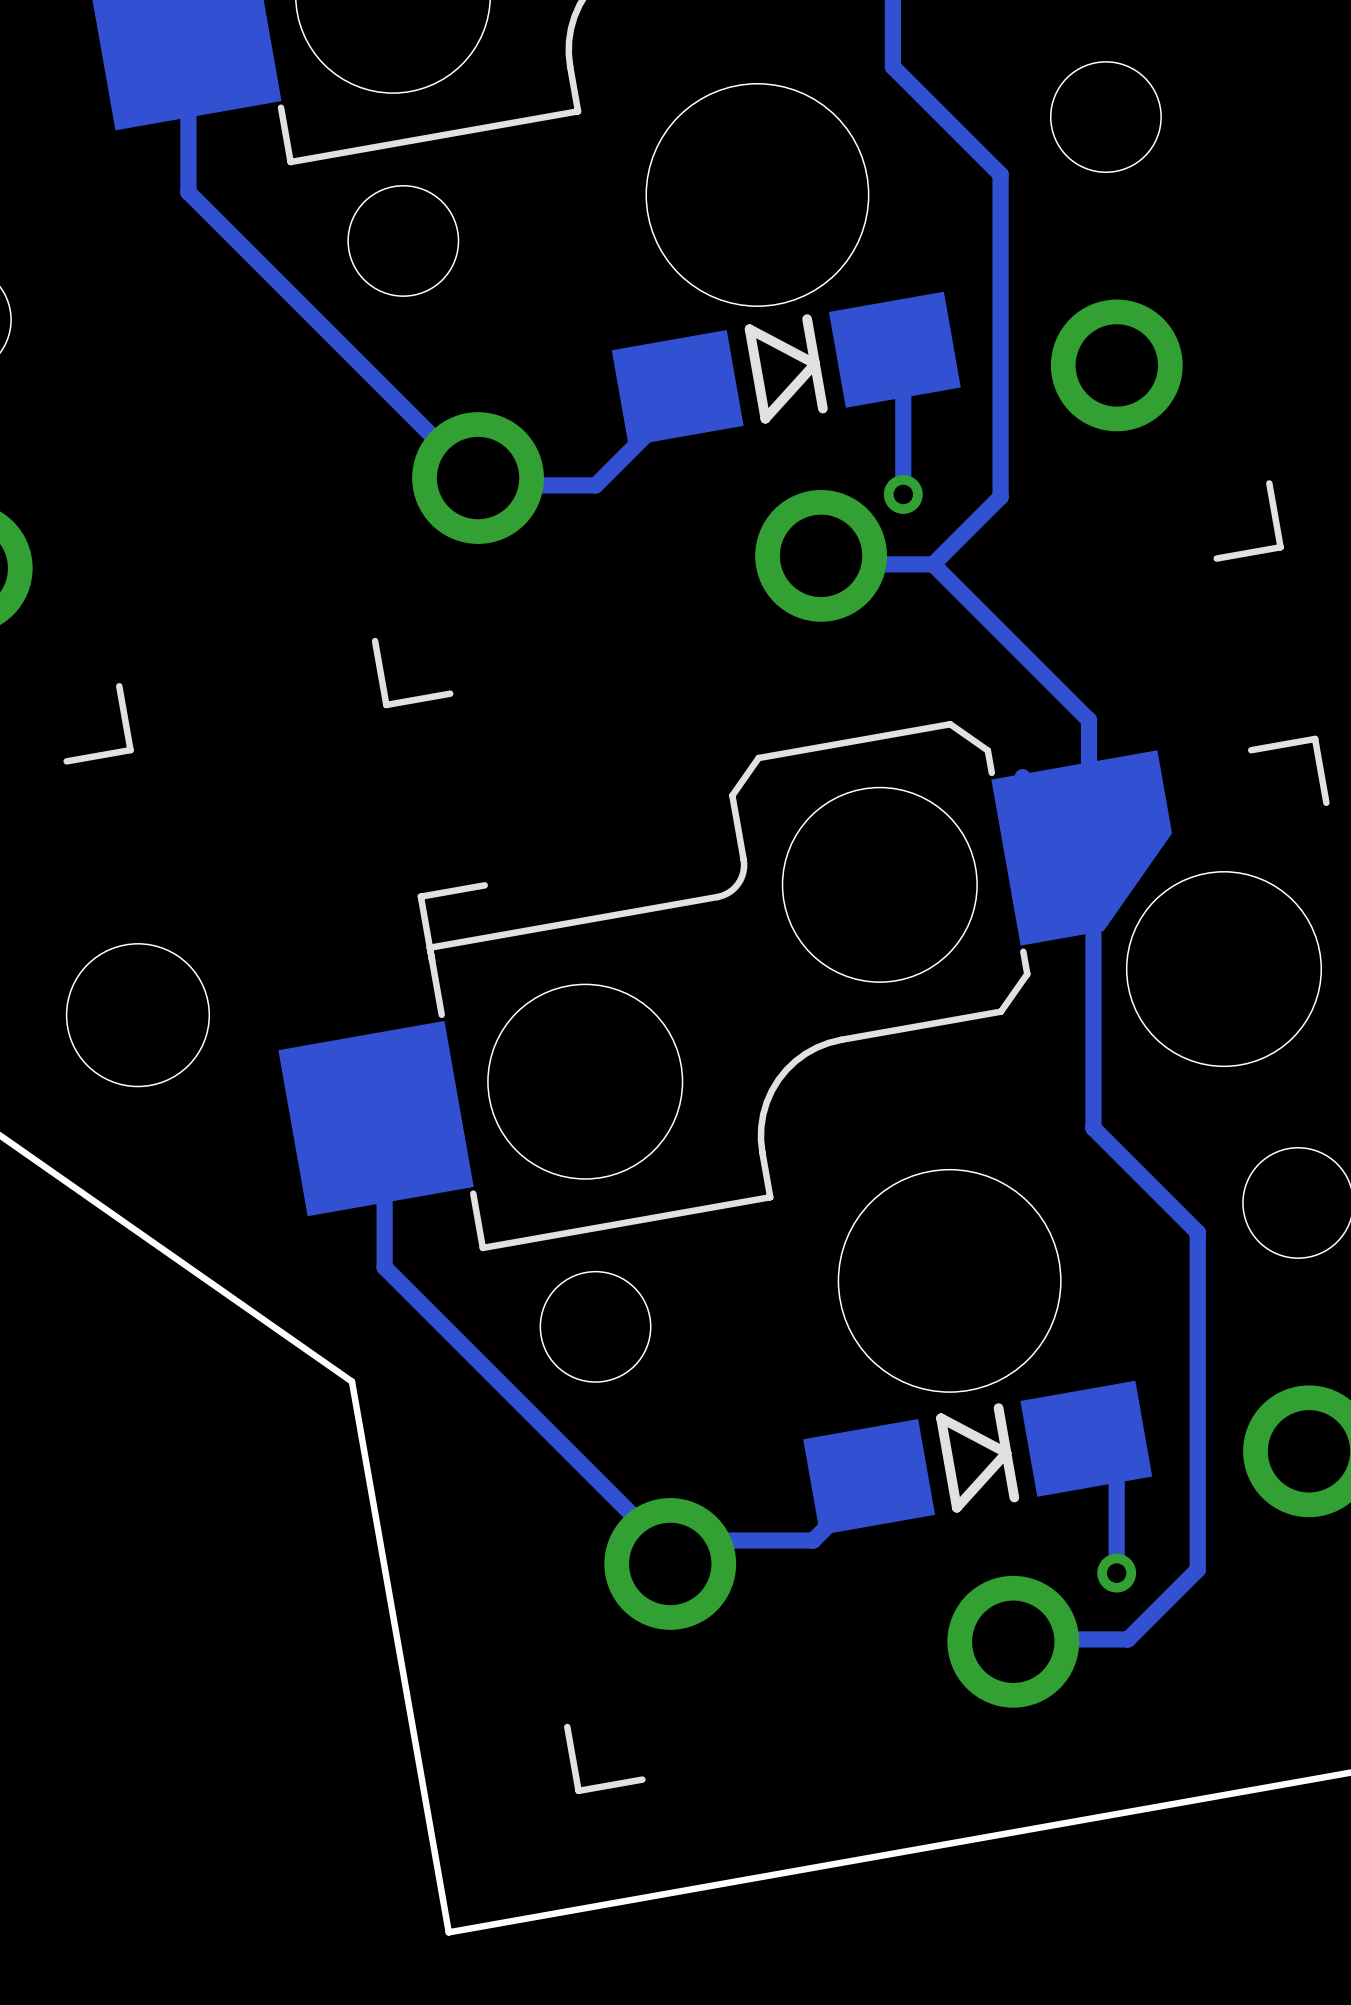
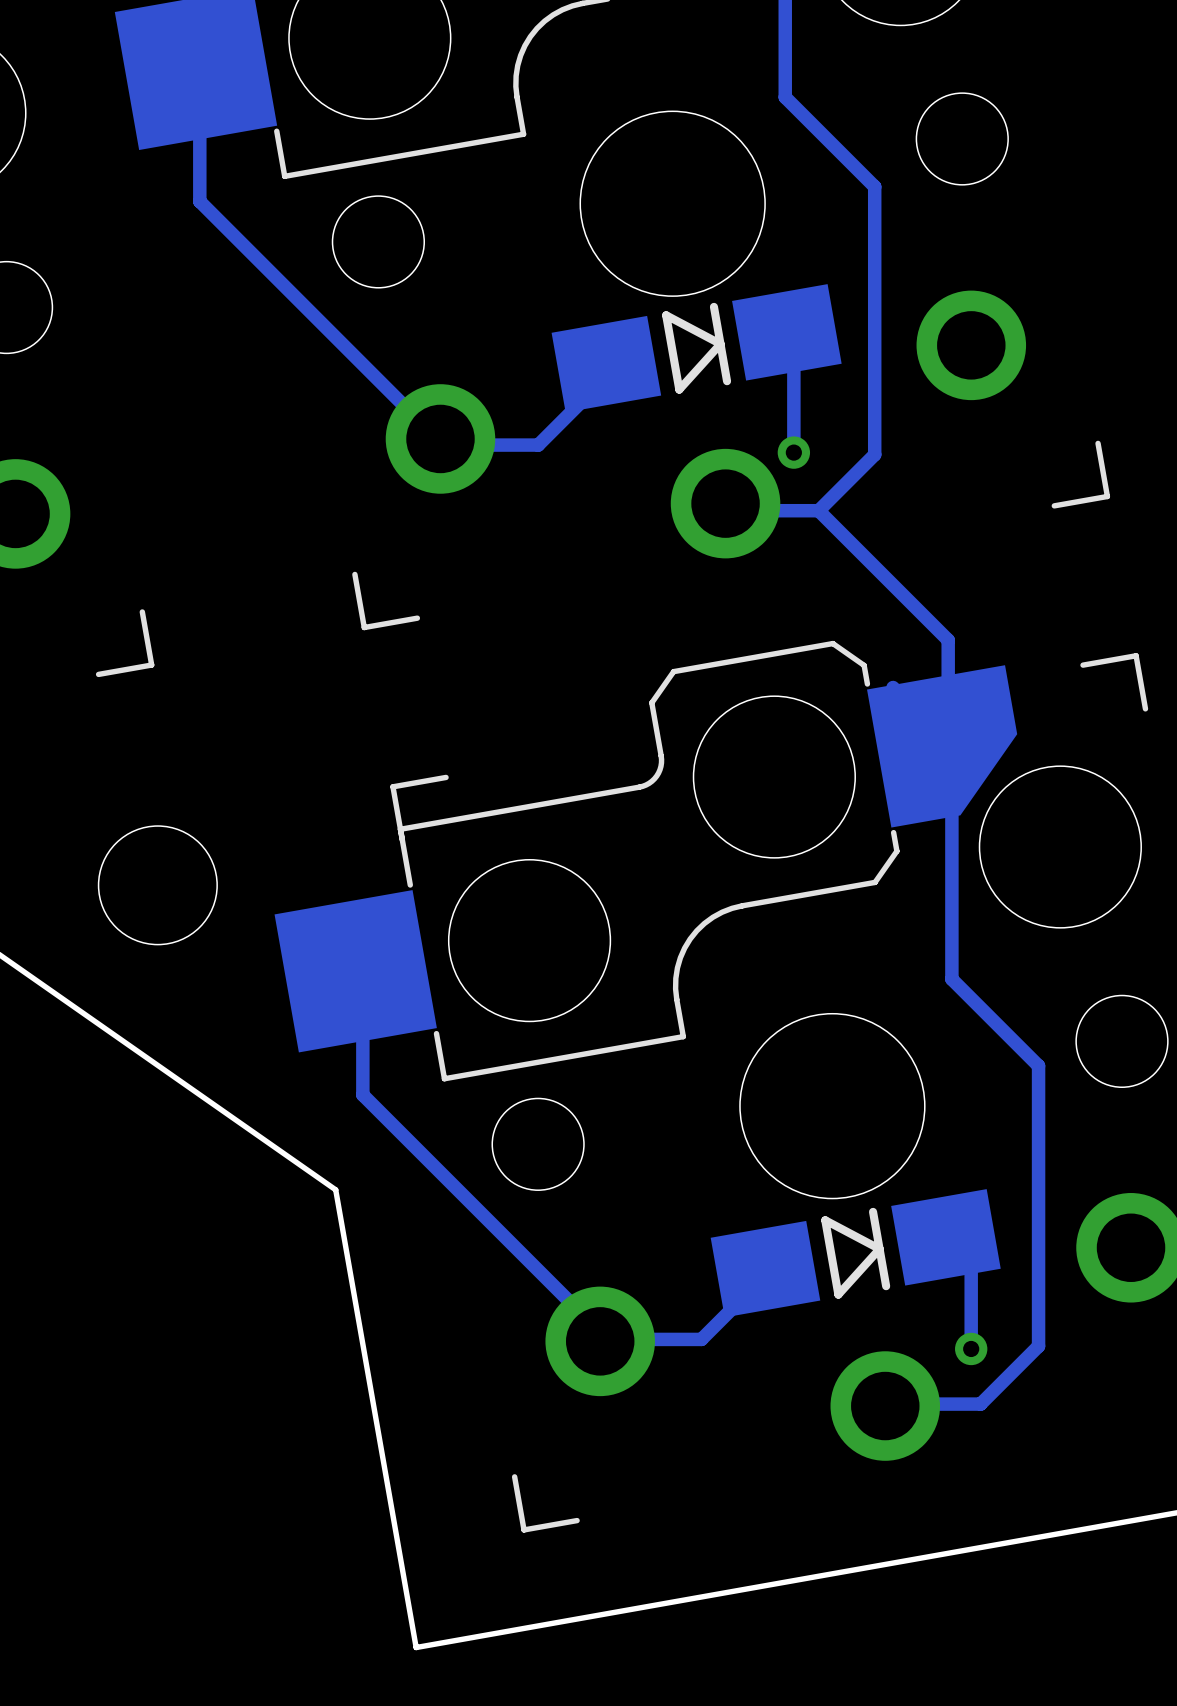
track: (813, 1540) (657, 1540) -> (719, 1321) (701, 1339) (607, 1339) (589, 1321)

